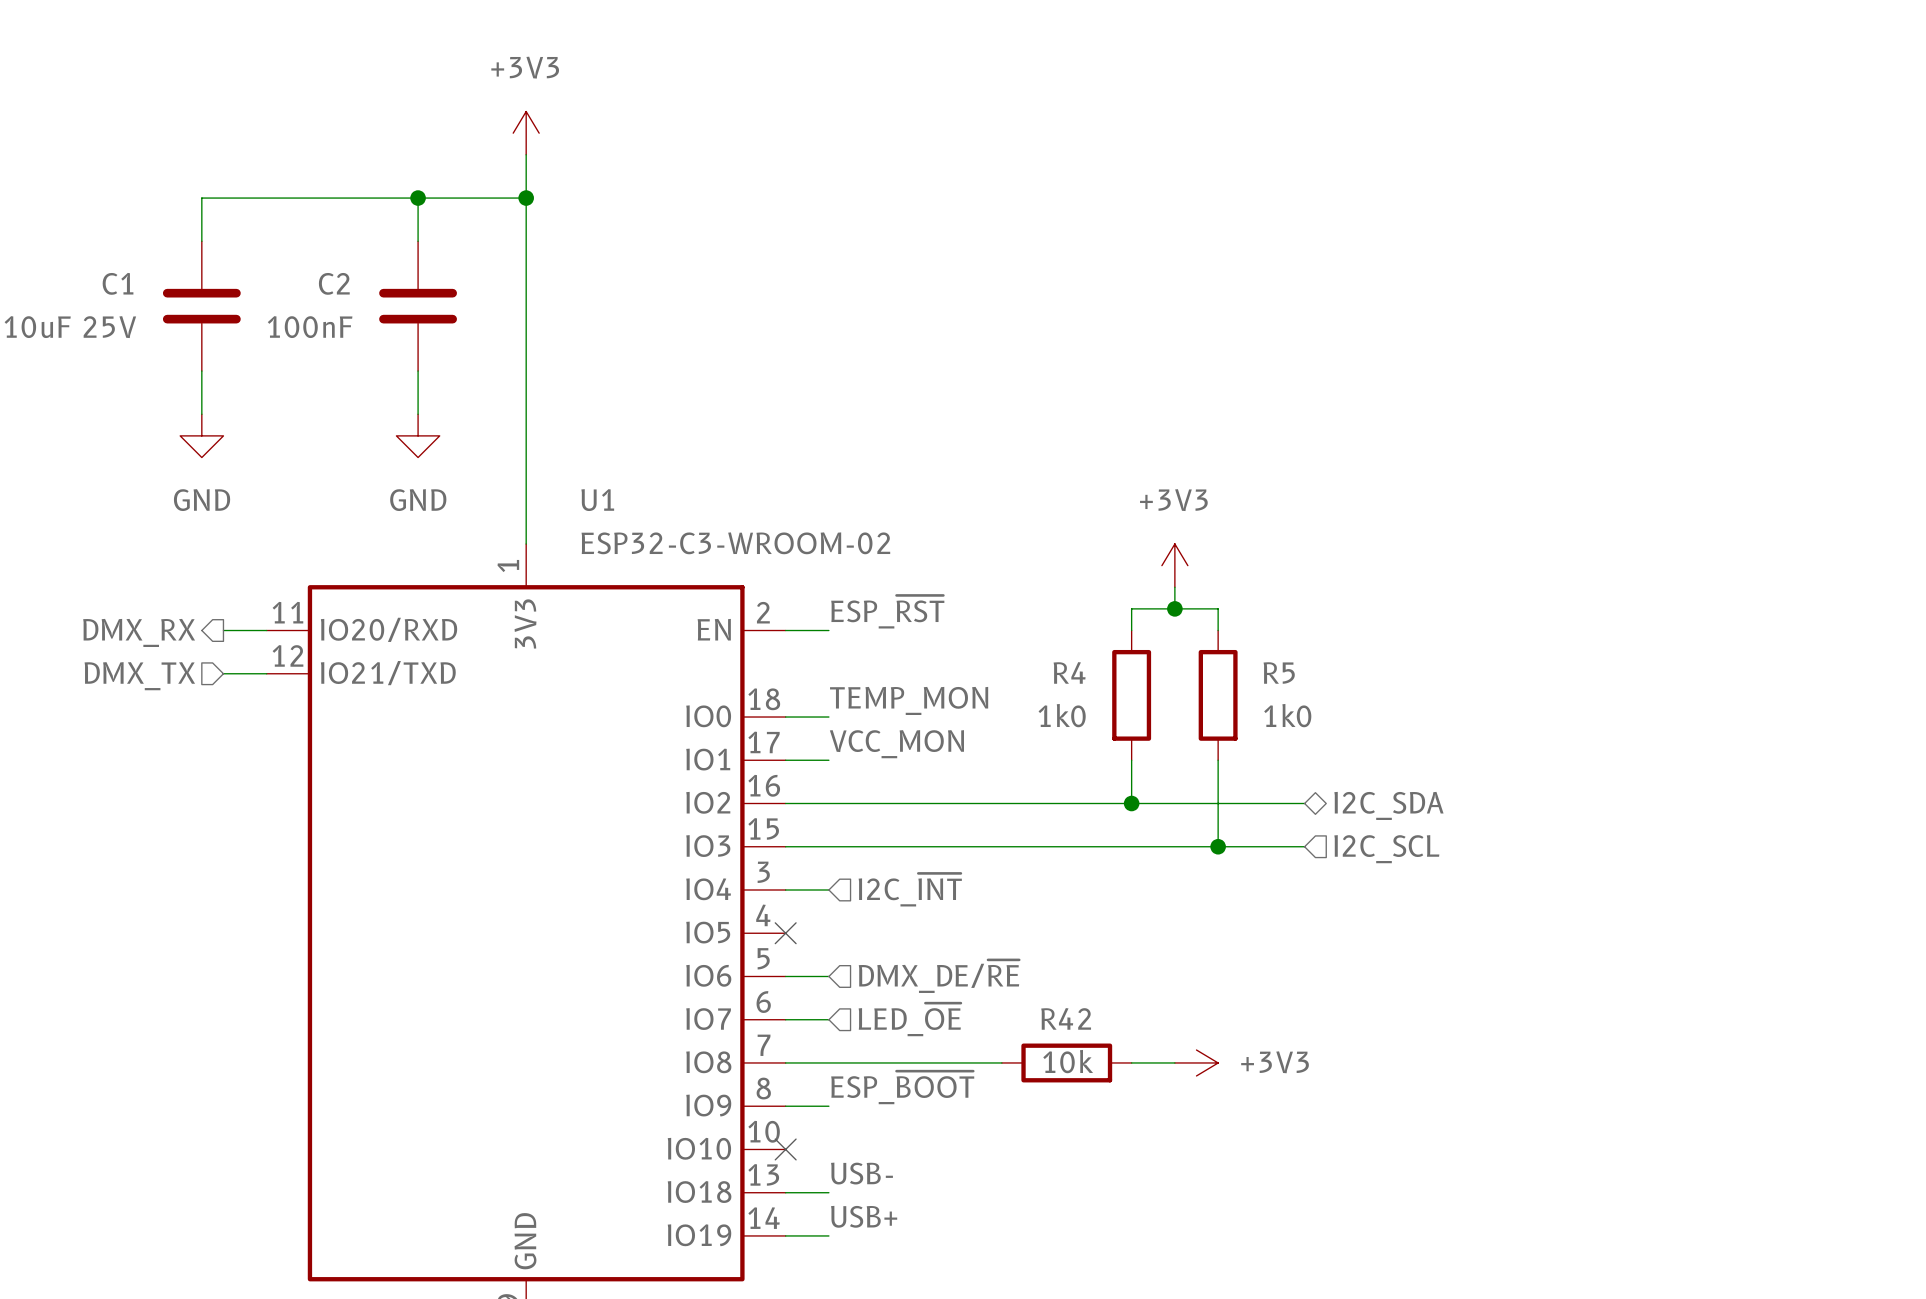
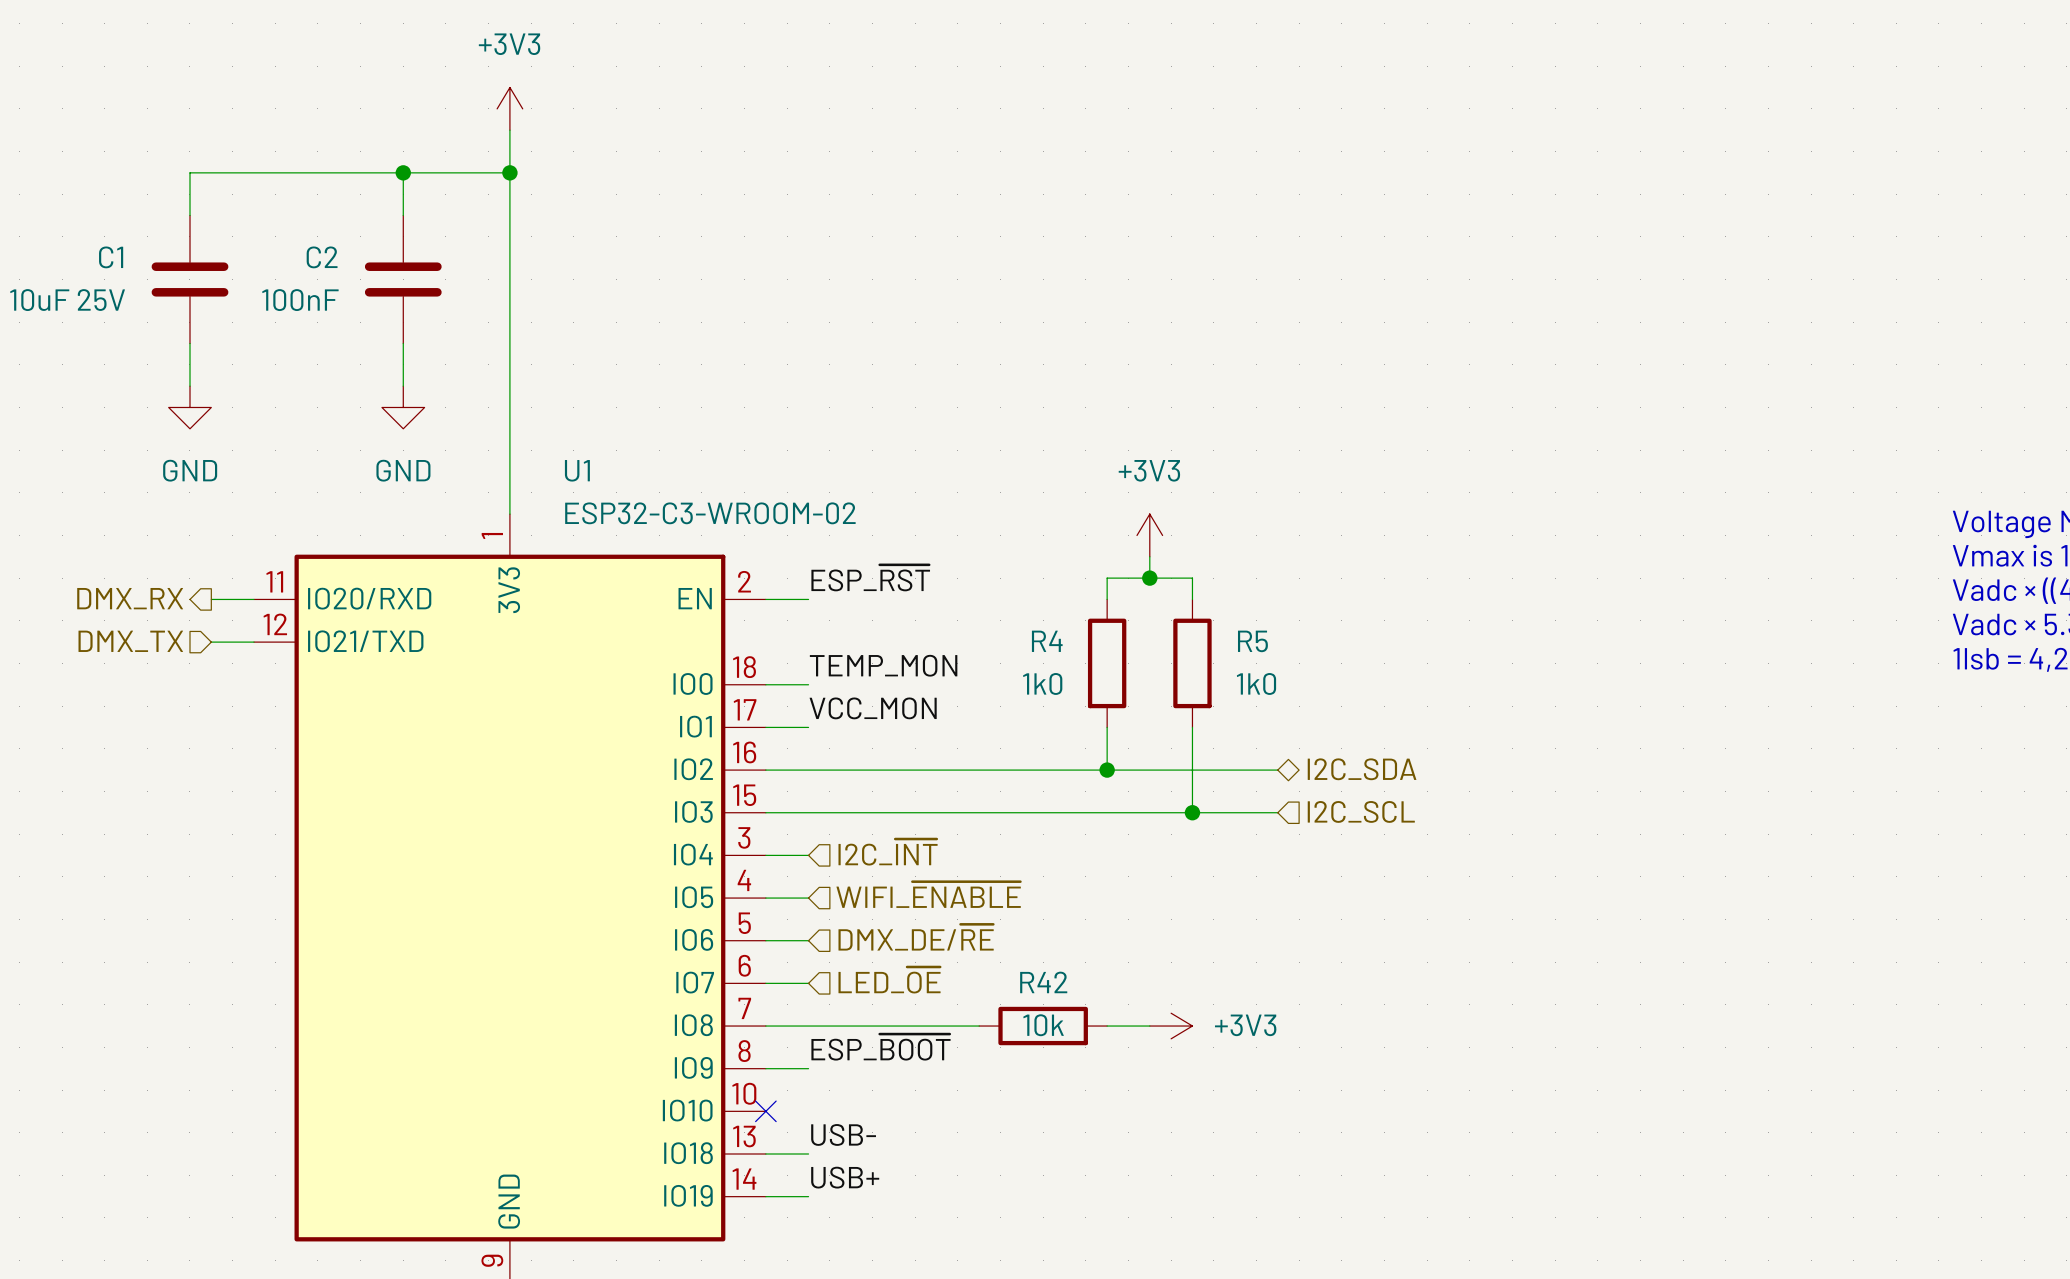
wire: none -> (765, 898) (808, 898)
no-connect mark: (785, 933) -> none
hierarchical label: none -> WIFI_~{ENABLE} (928, 894)

